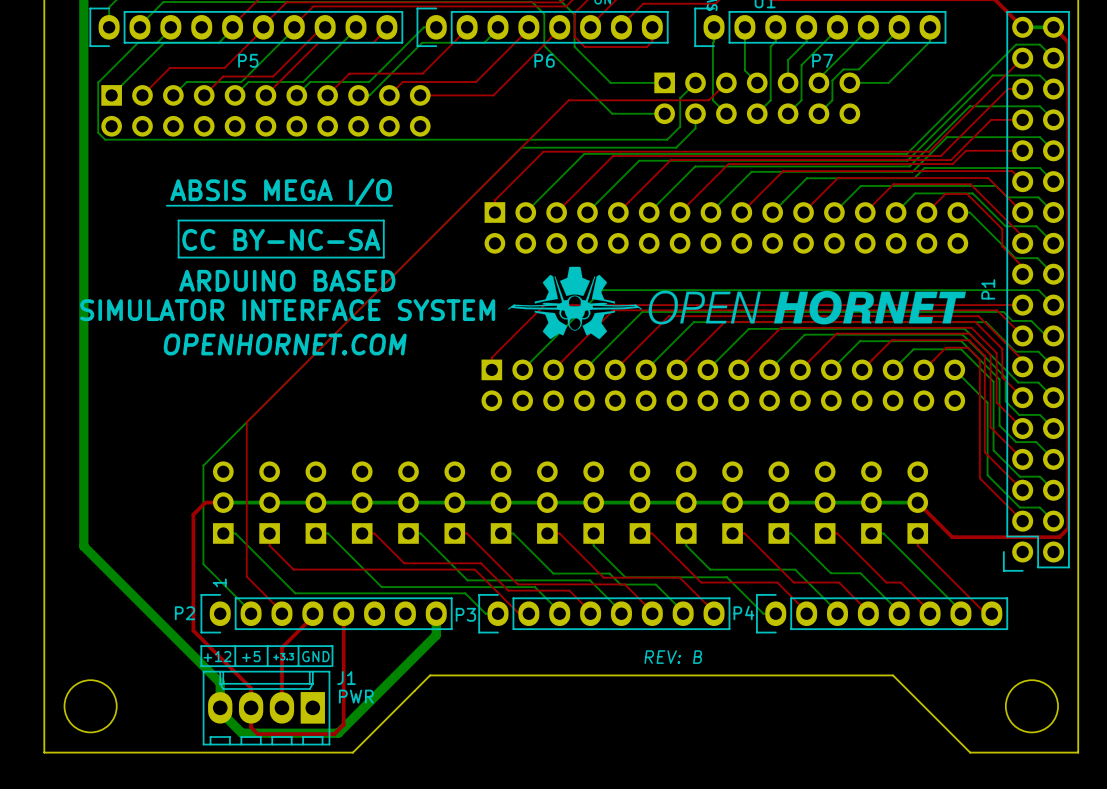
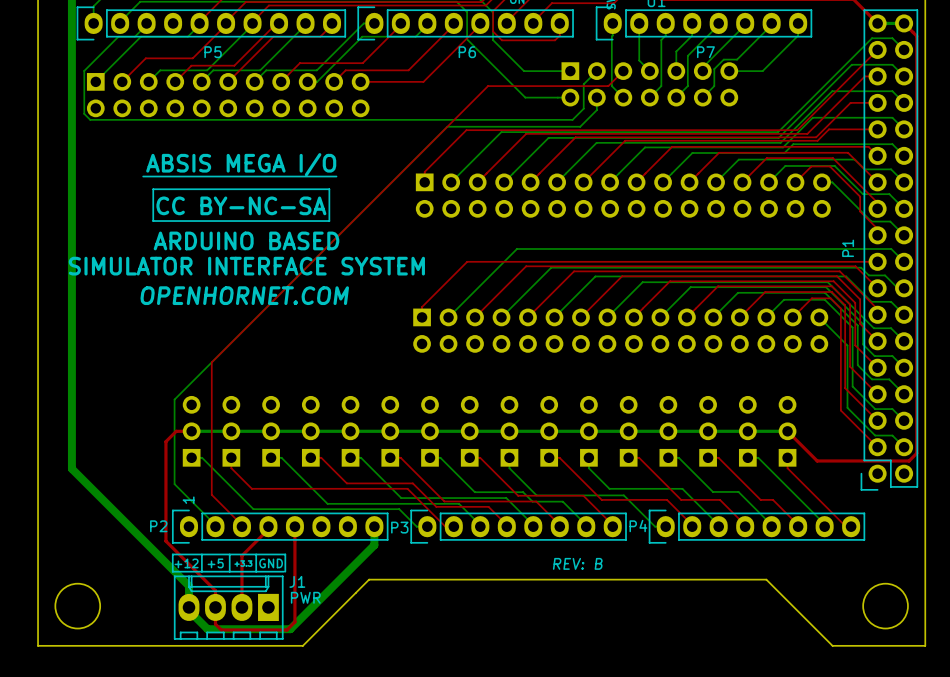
drawing: [508, 266, 966, 340] -> none

